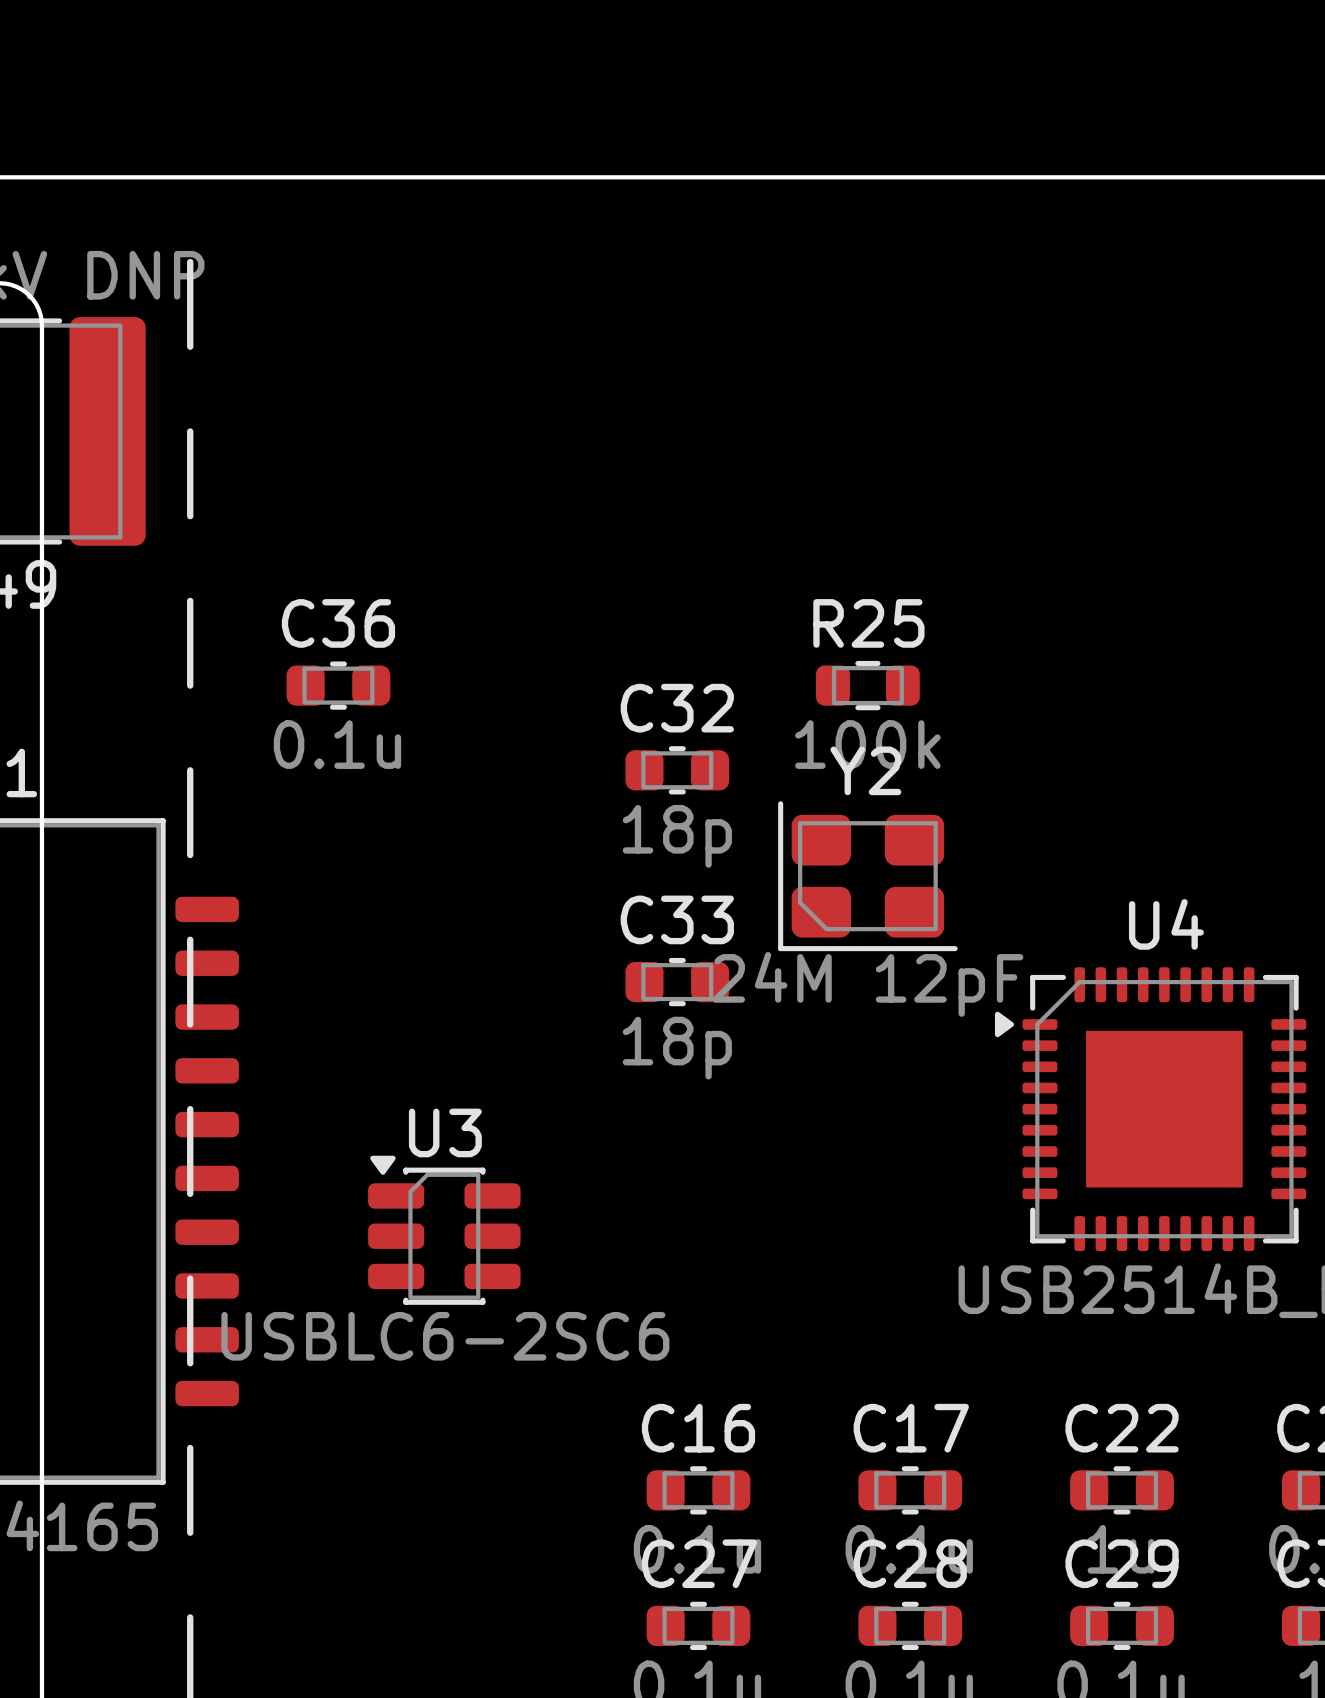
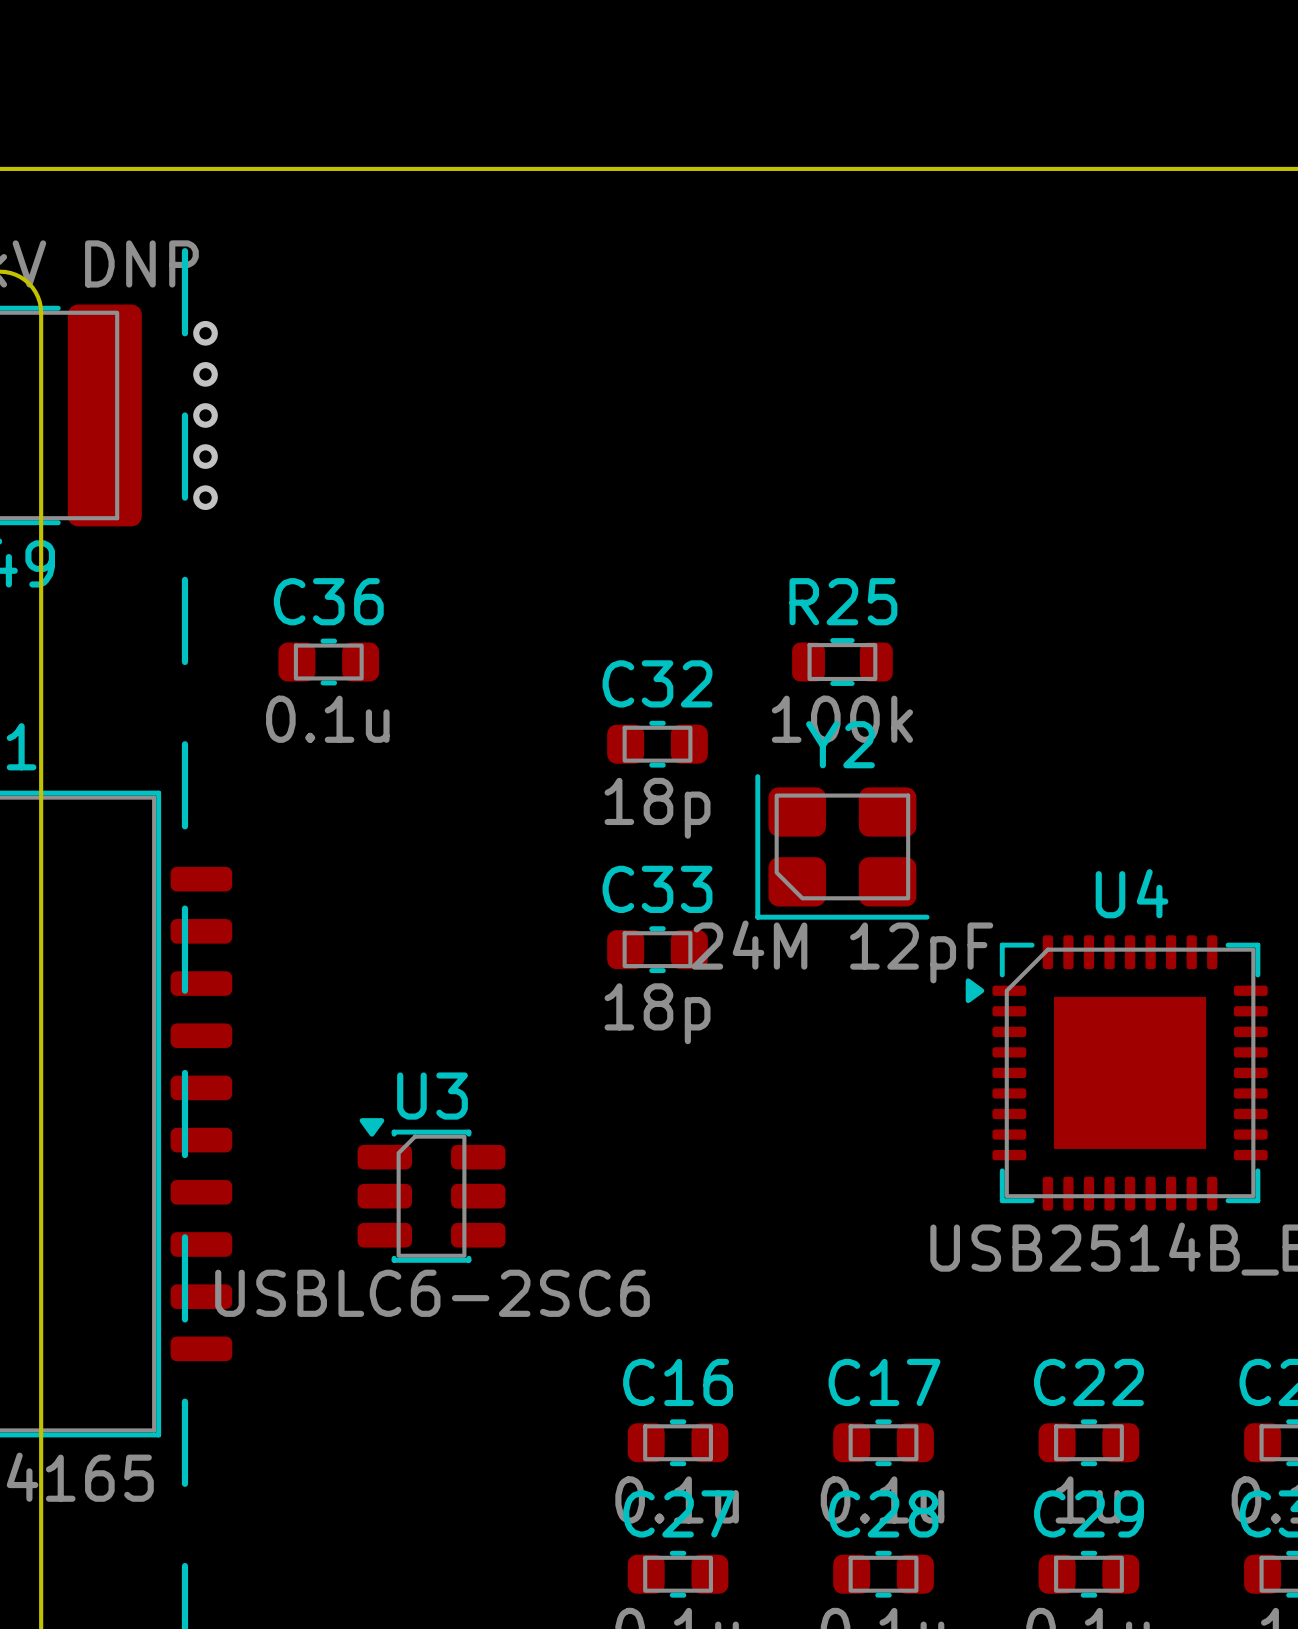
via: none -> (205, 333)
via: none -> (205, 374)
via: none -> (205, 415)
via: none -> (205, 456)
via: none -> (205, 497)

